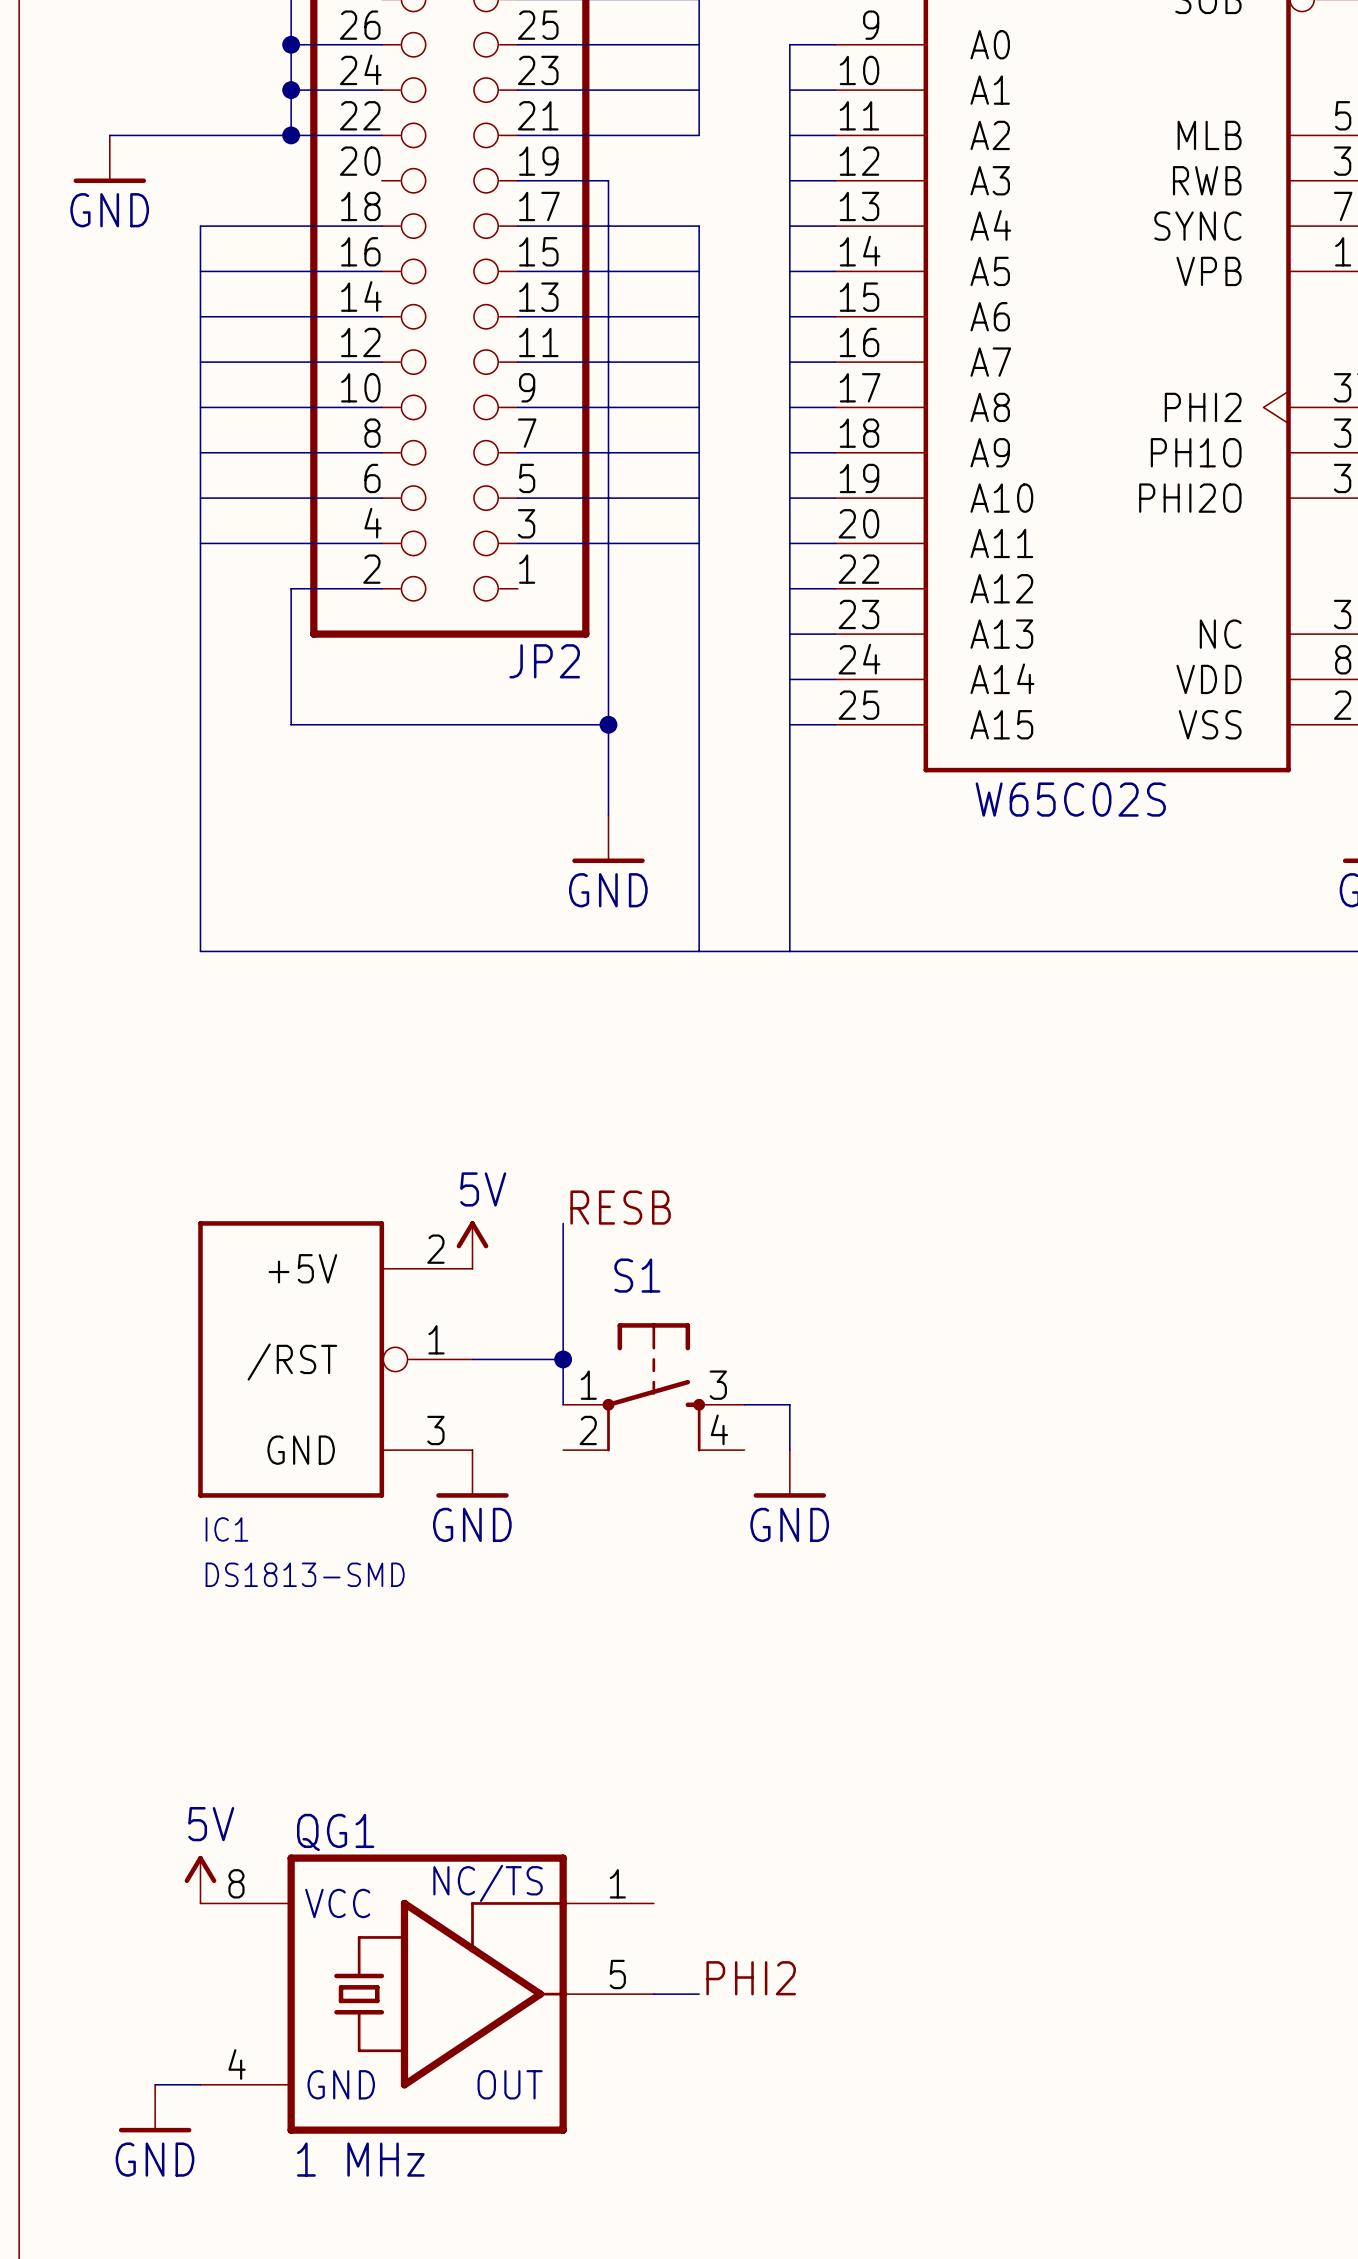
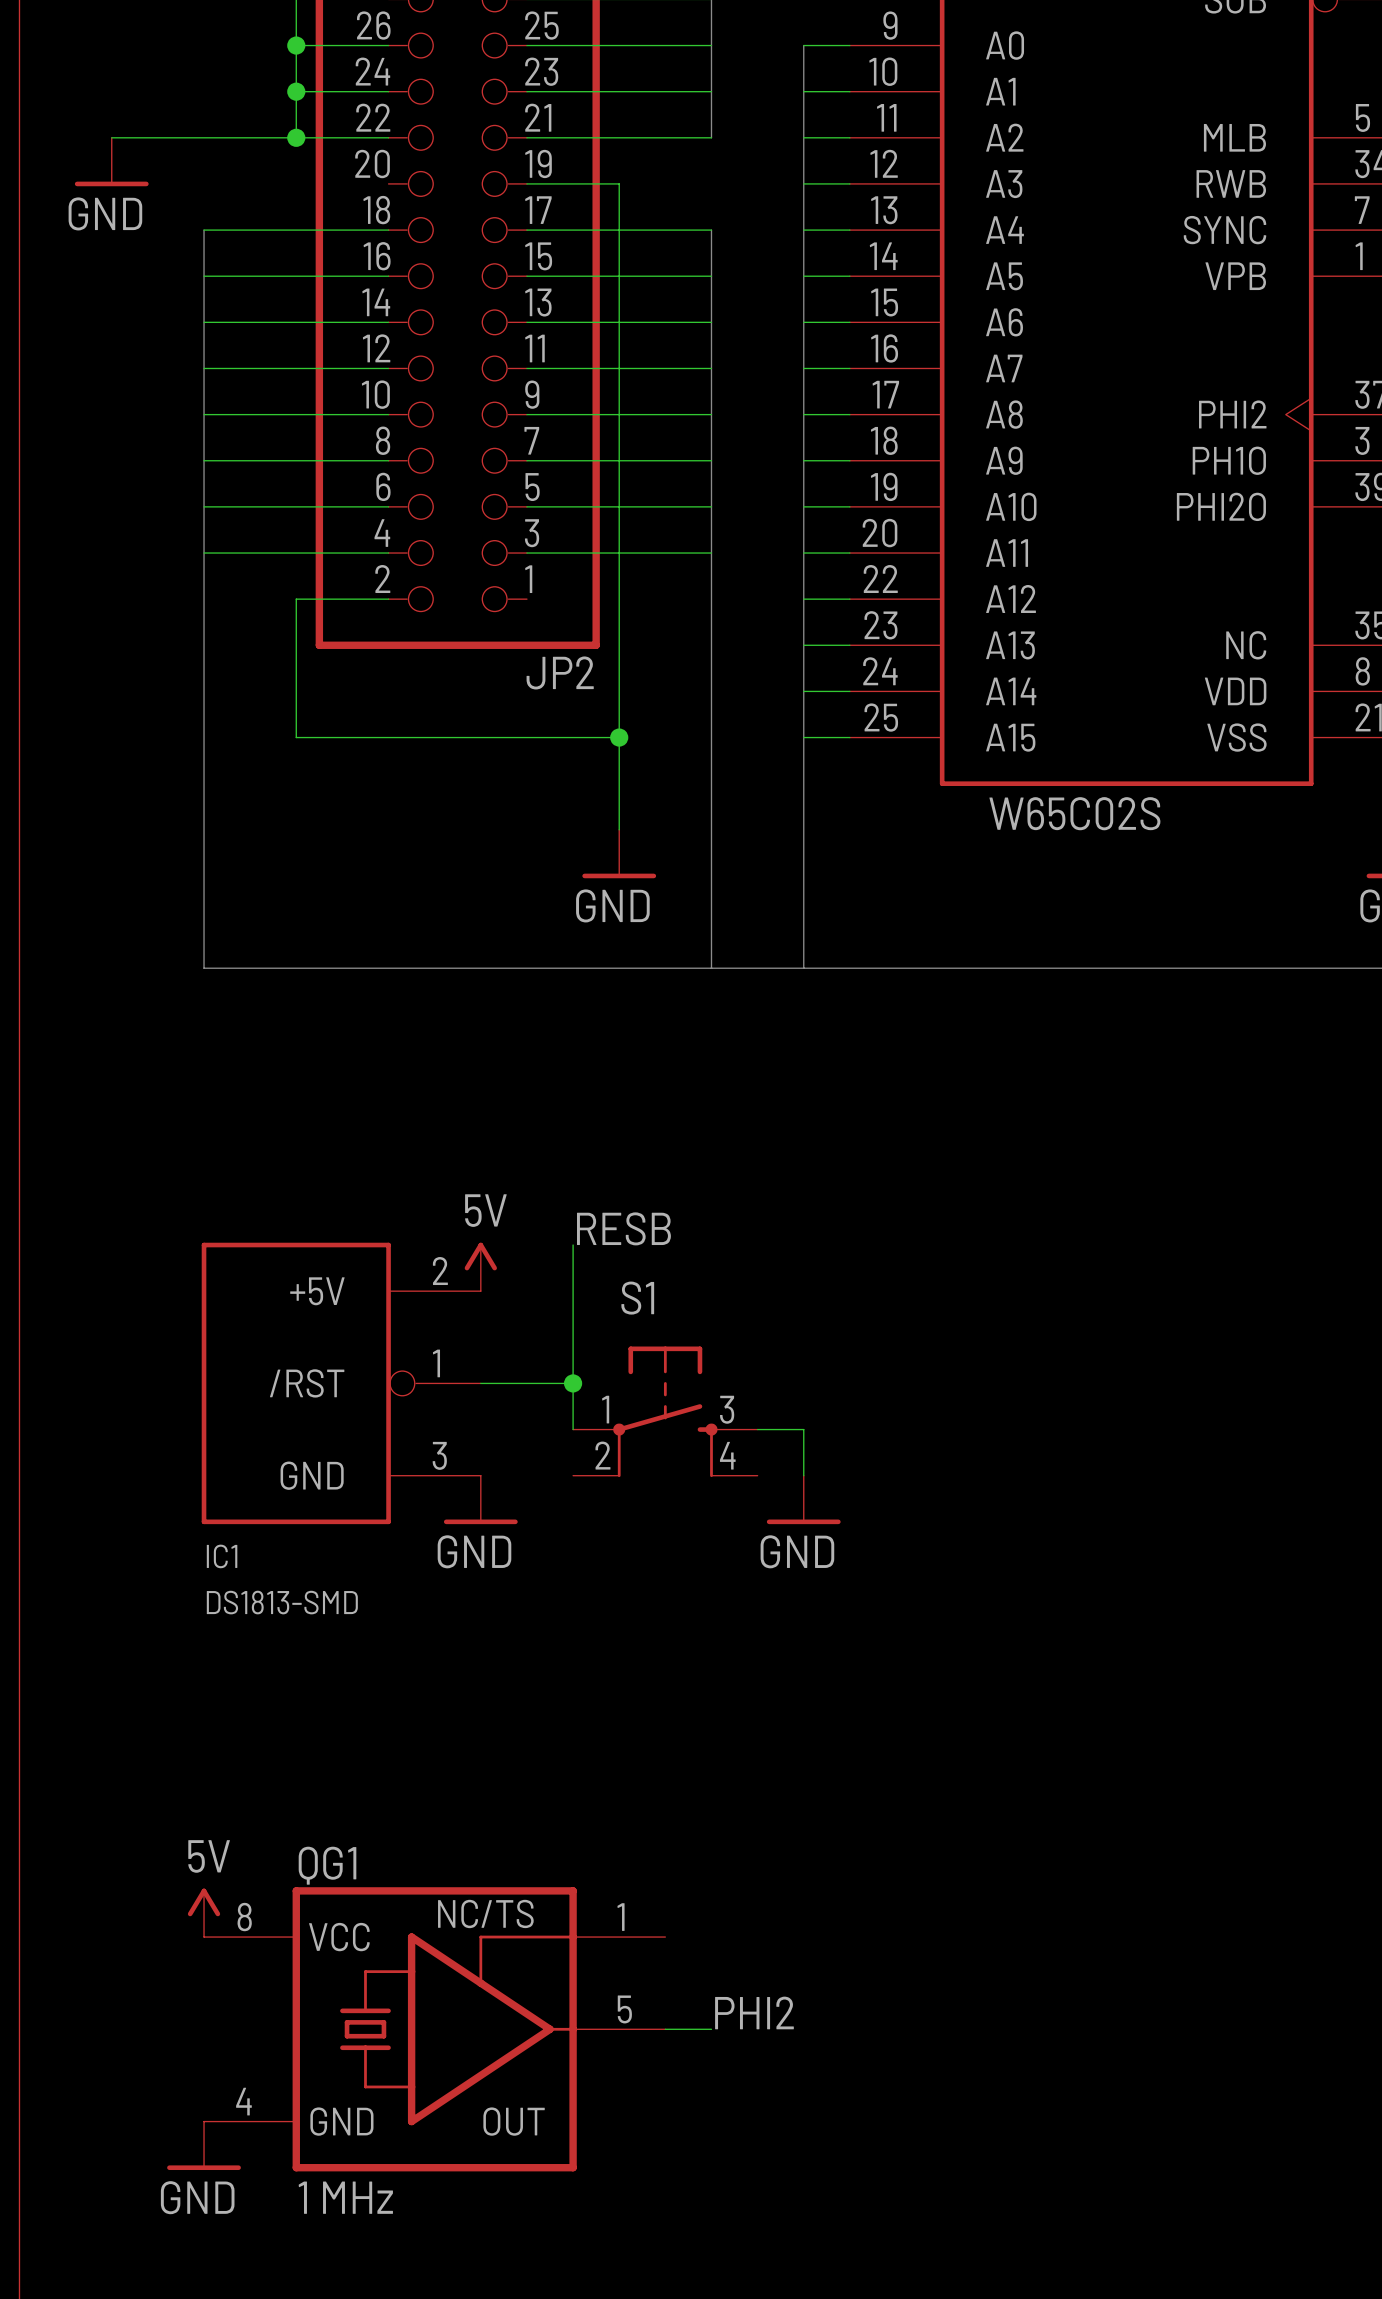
wire: (155, 2084) (200, 2084) -> none
power symbol position: GND (155, 2108) -> GND (204, 2145)

